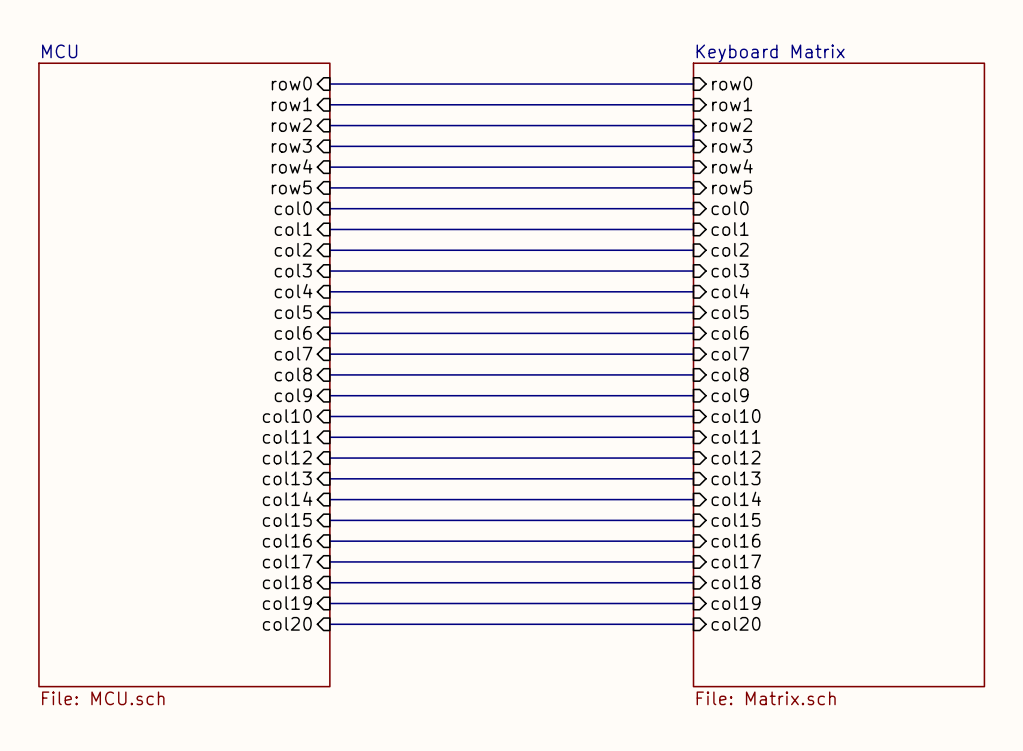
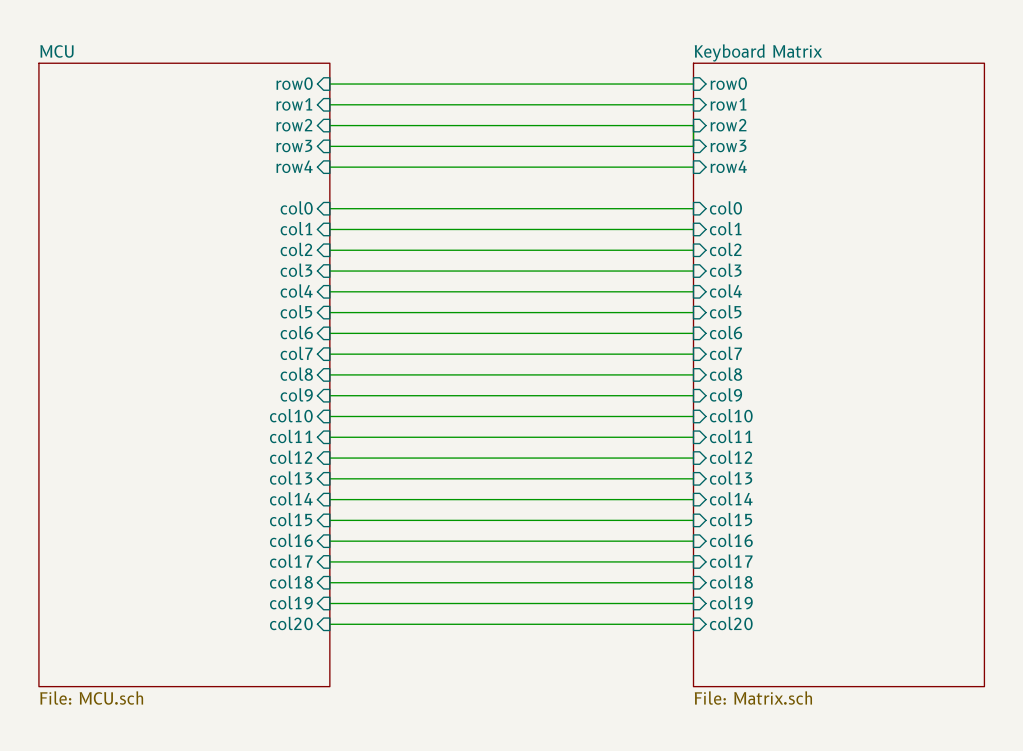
sheet pin: row5 (291, 187) -> none
wire: (329, 187) (693, 187) -> none
sheet pin: row5 (732, 187) -> none

